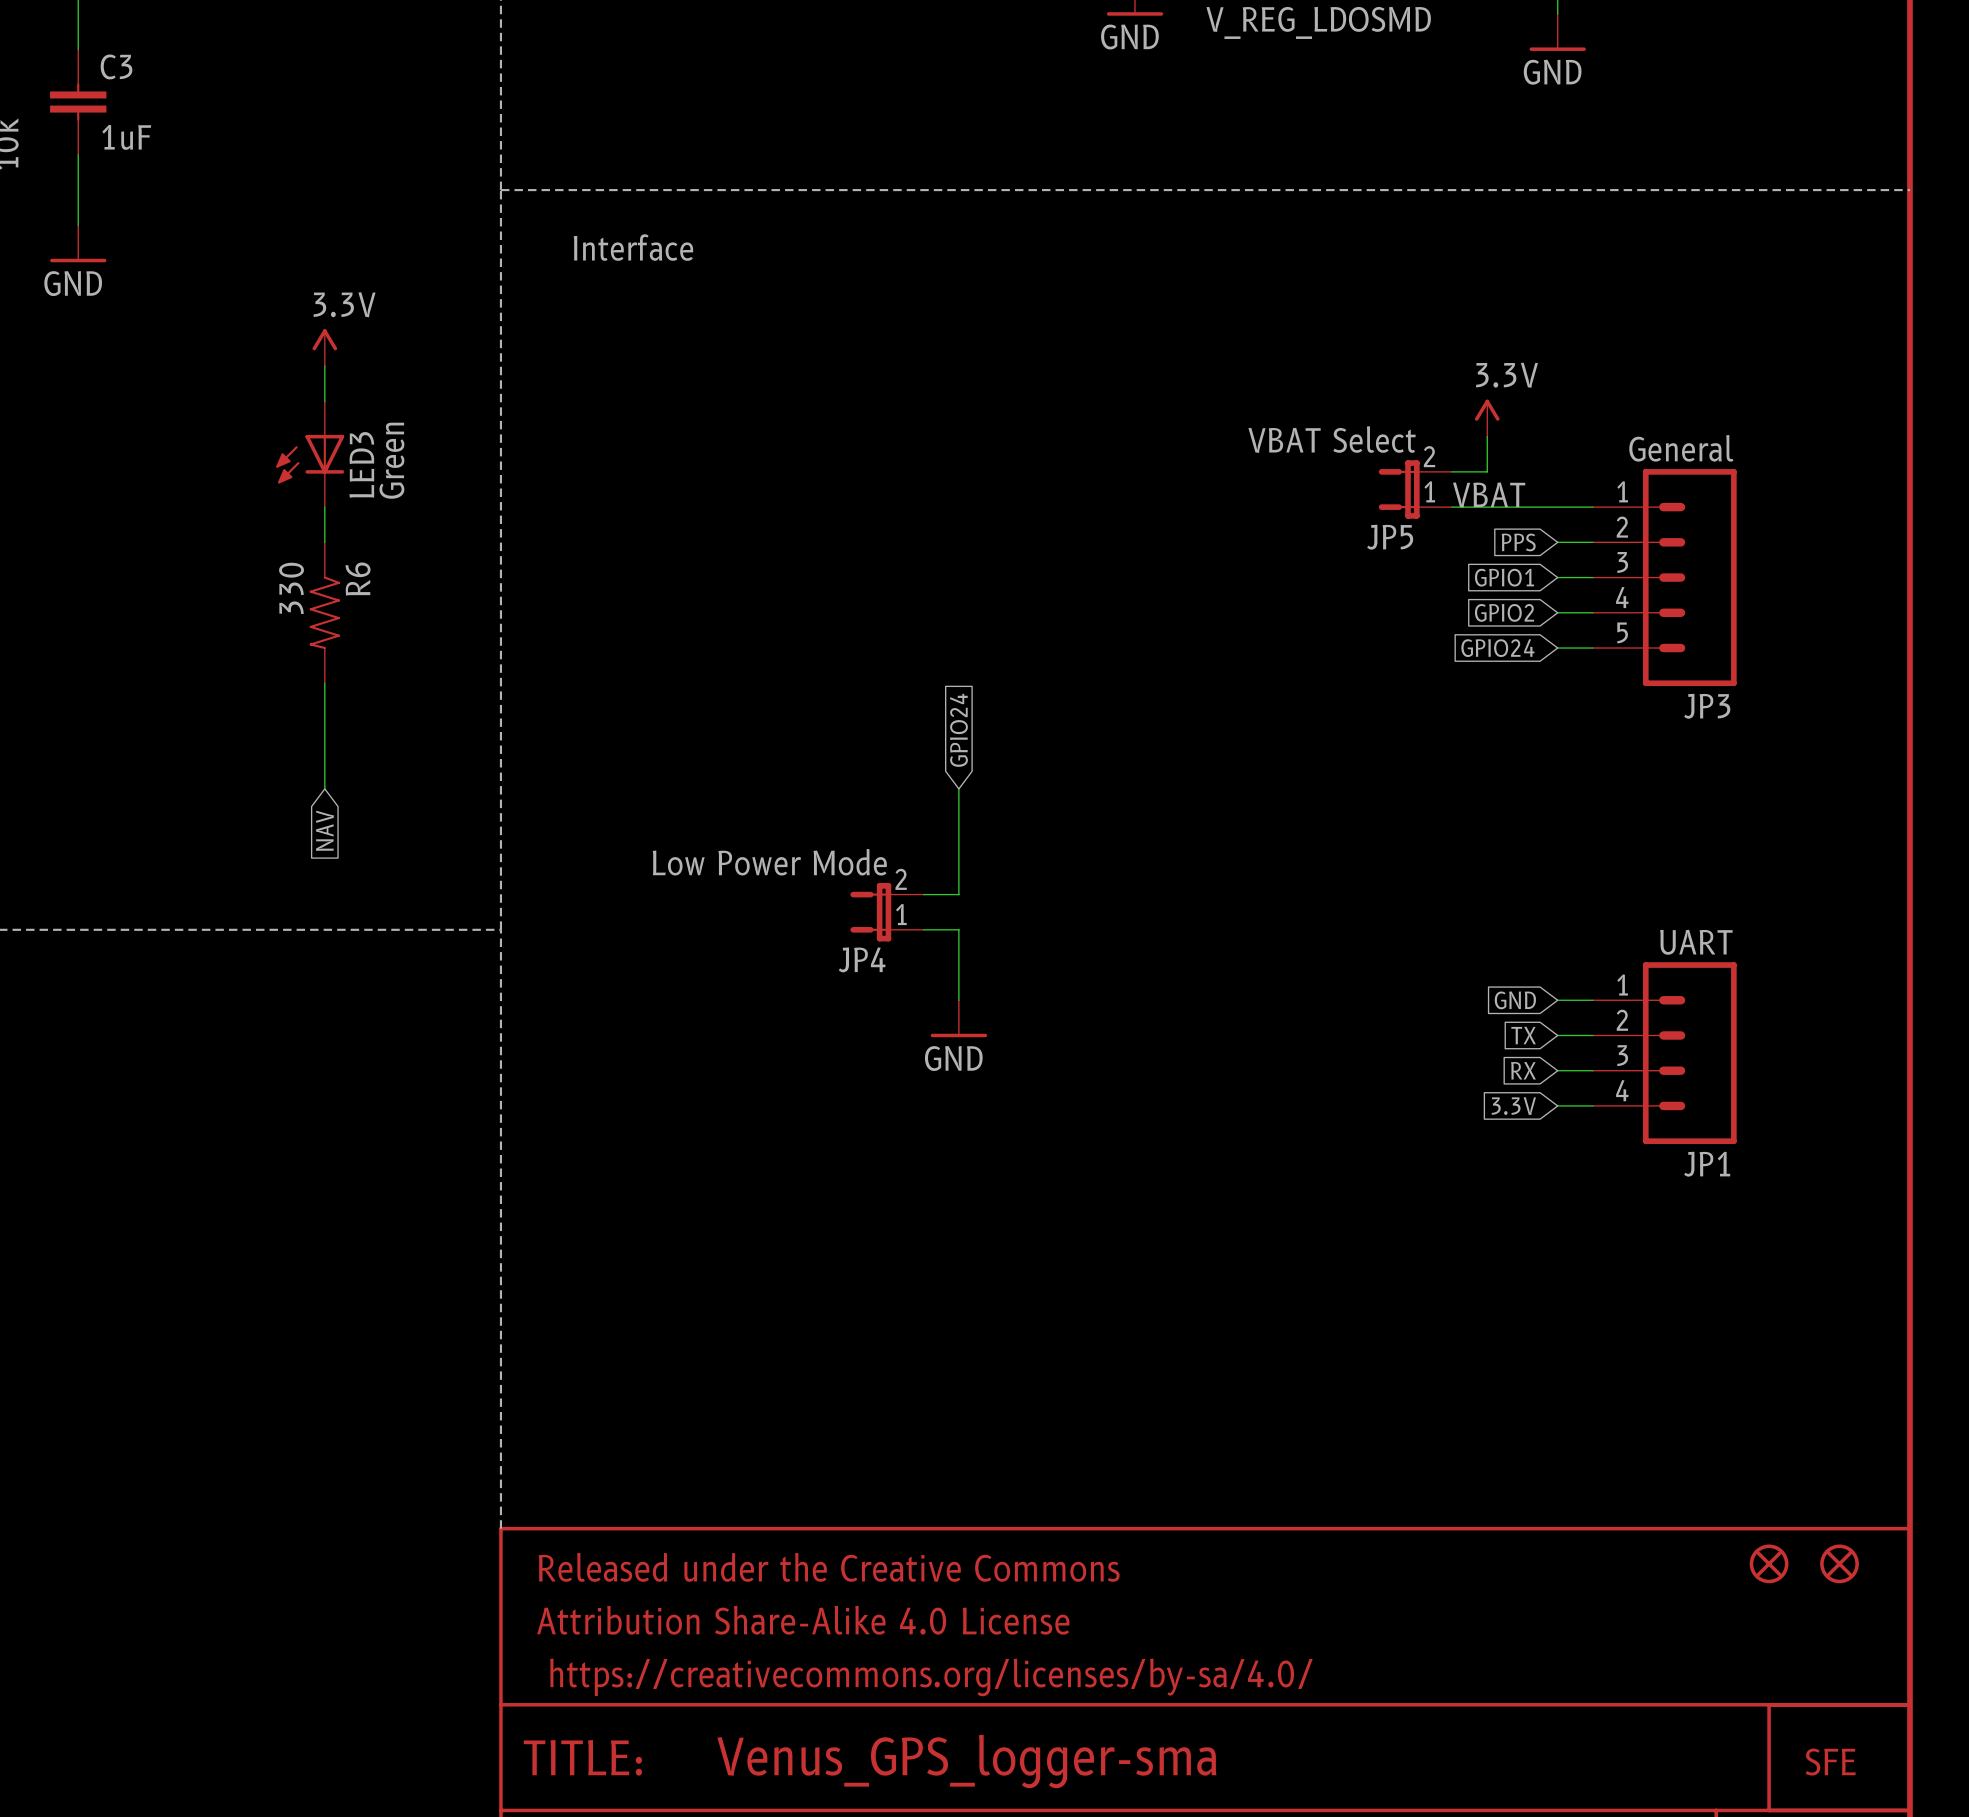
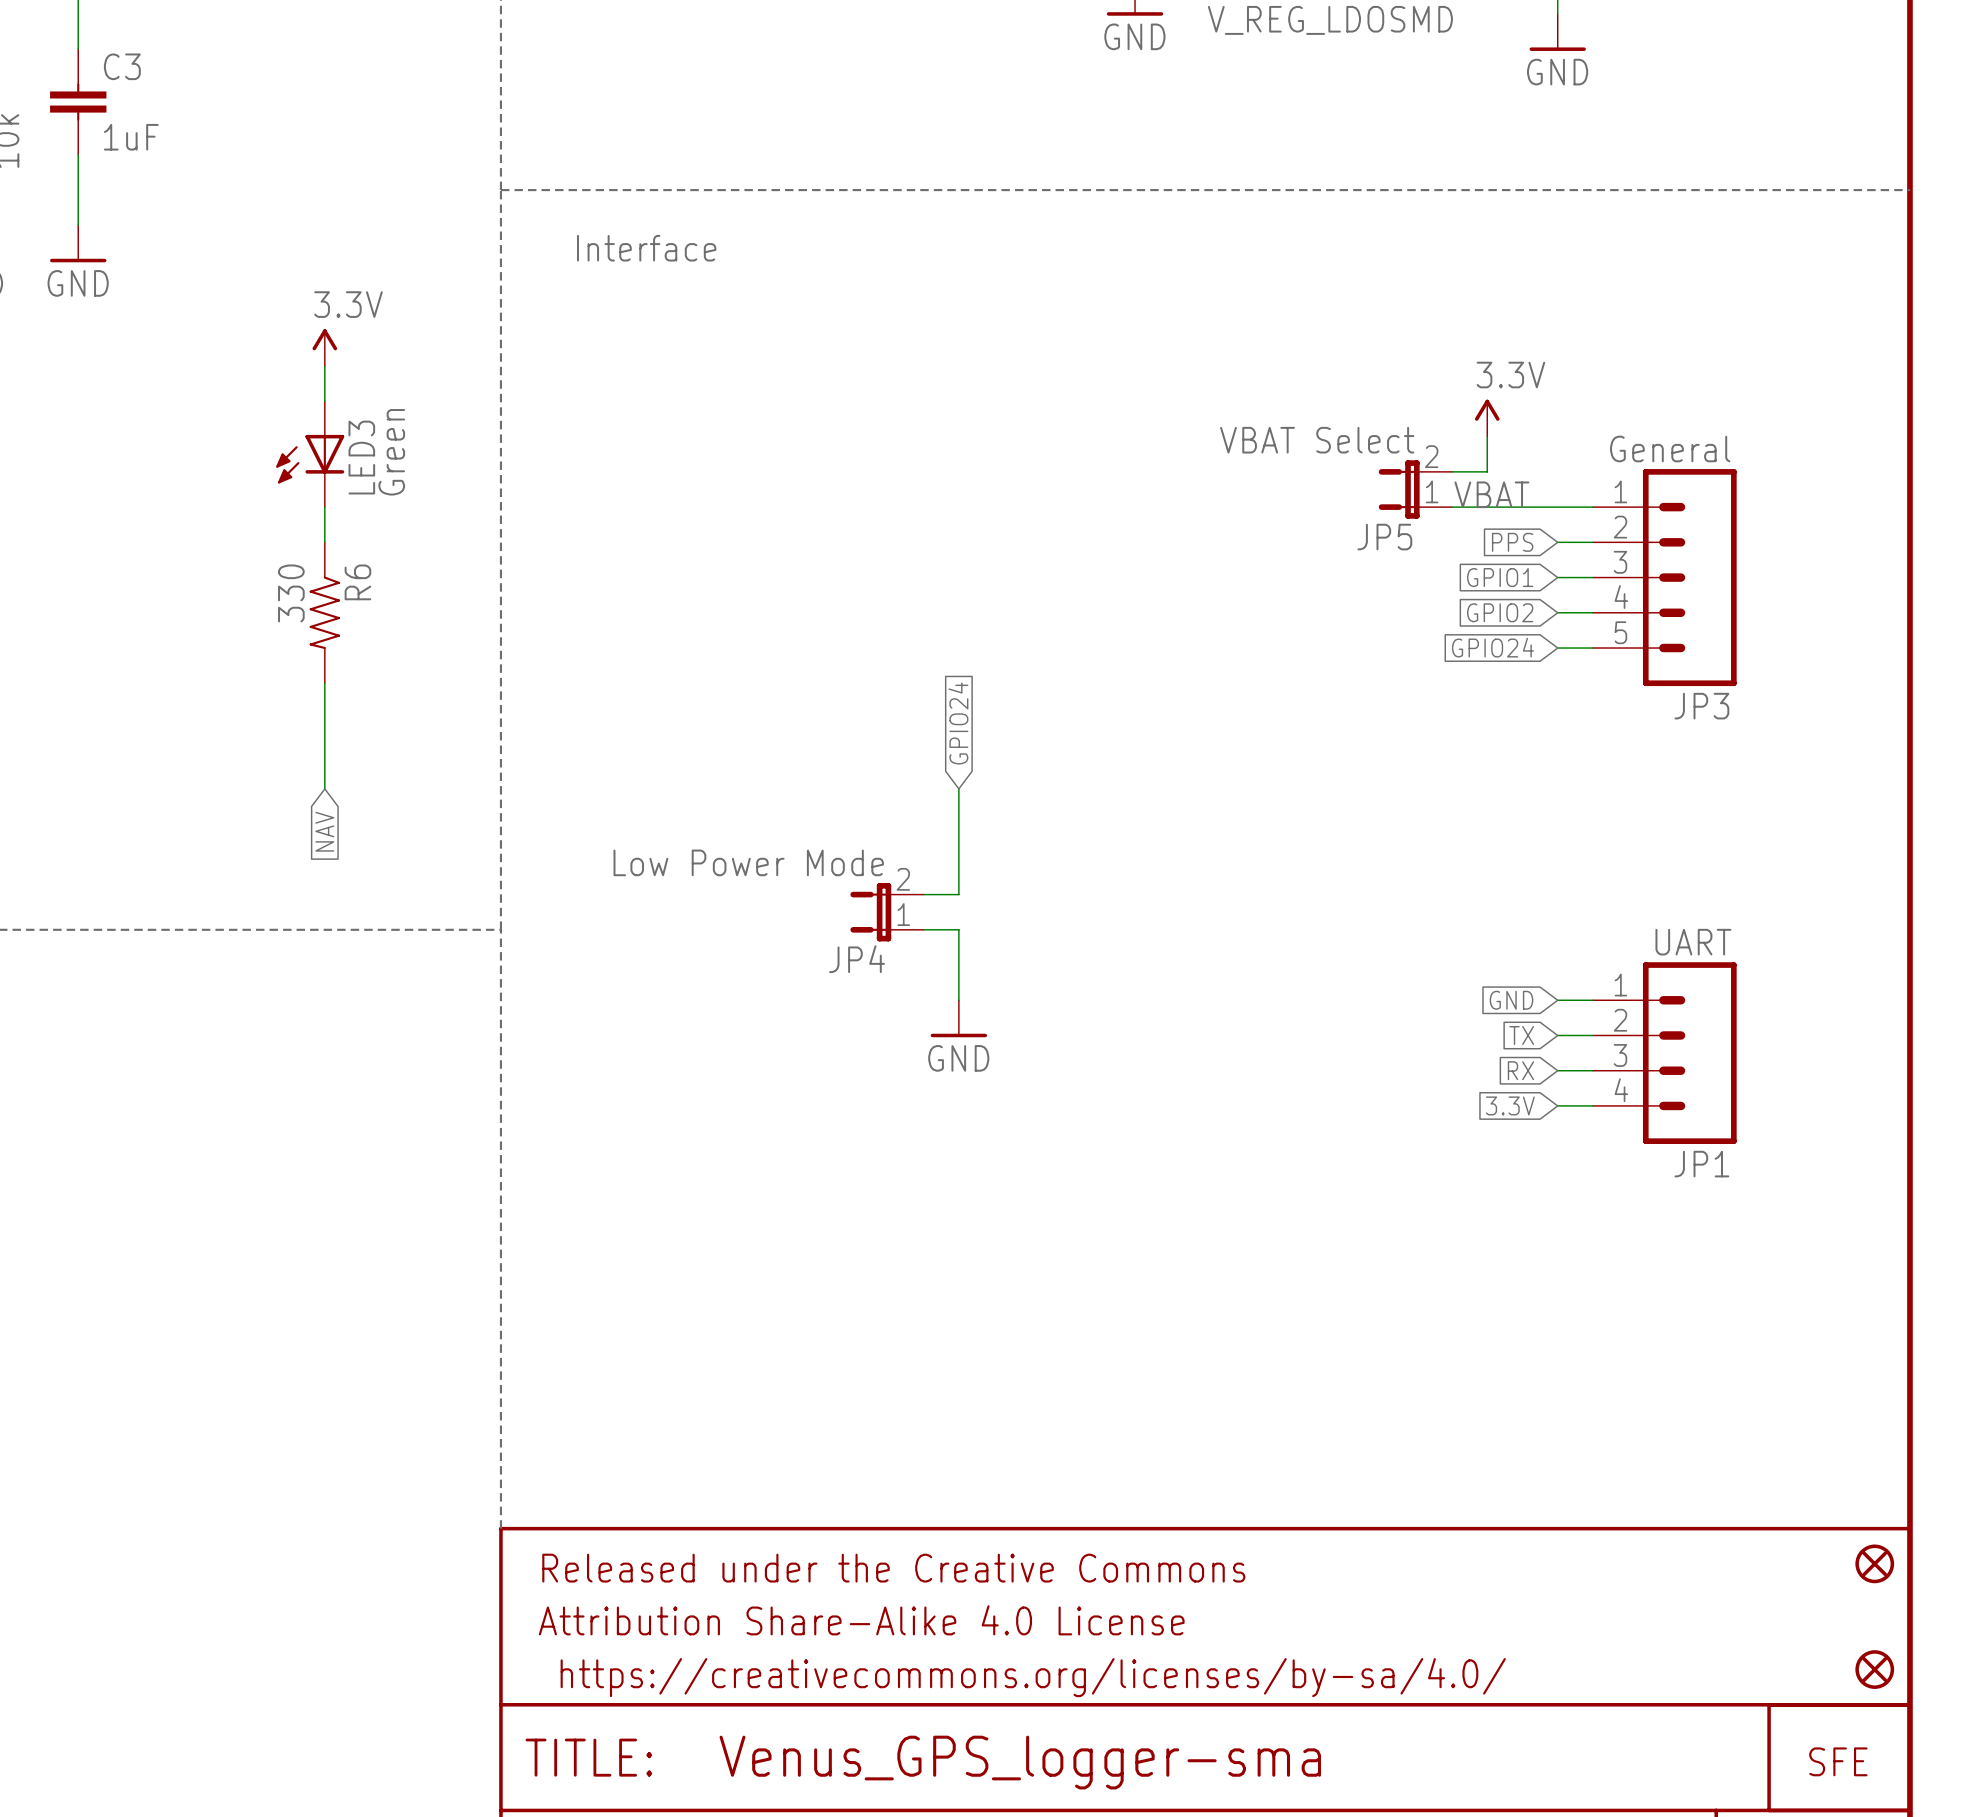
part: (1769, 1563) -> none
part position: (1839, 1563) -> (1874, 1563)
part: none -> (1874, 1669)

